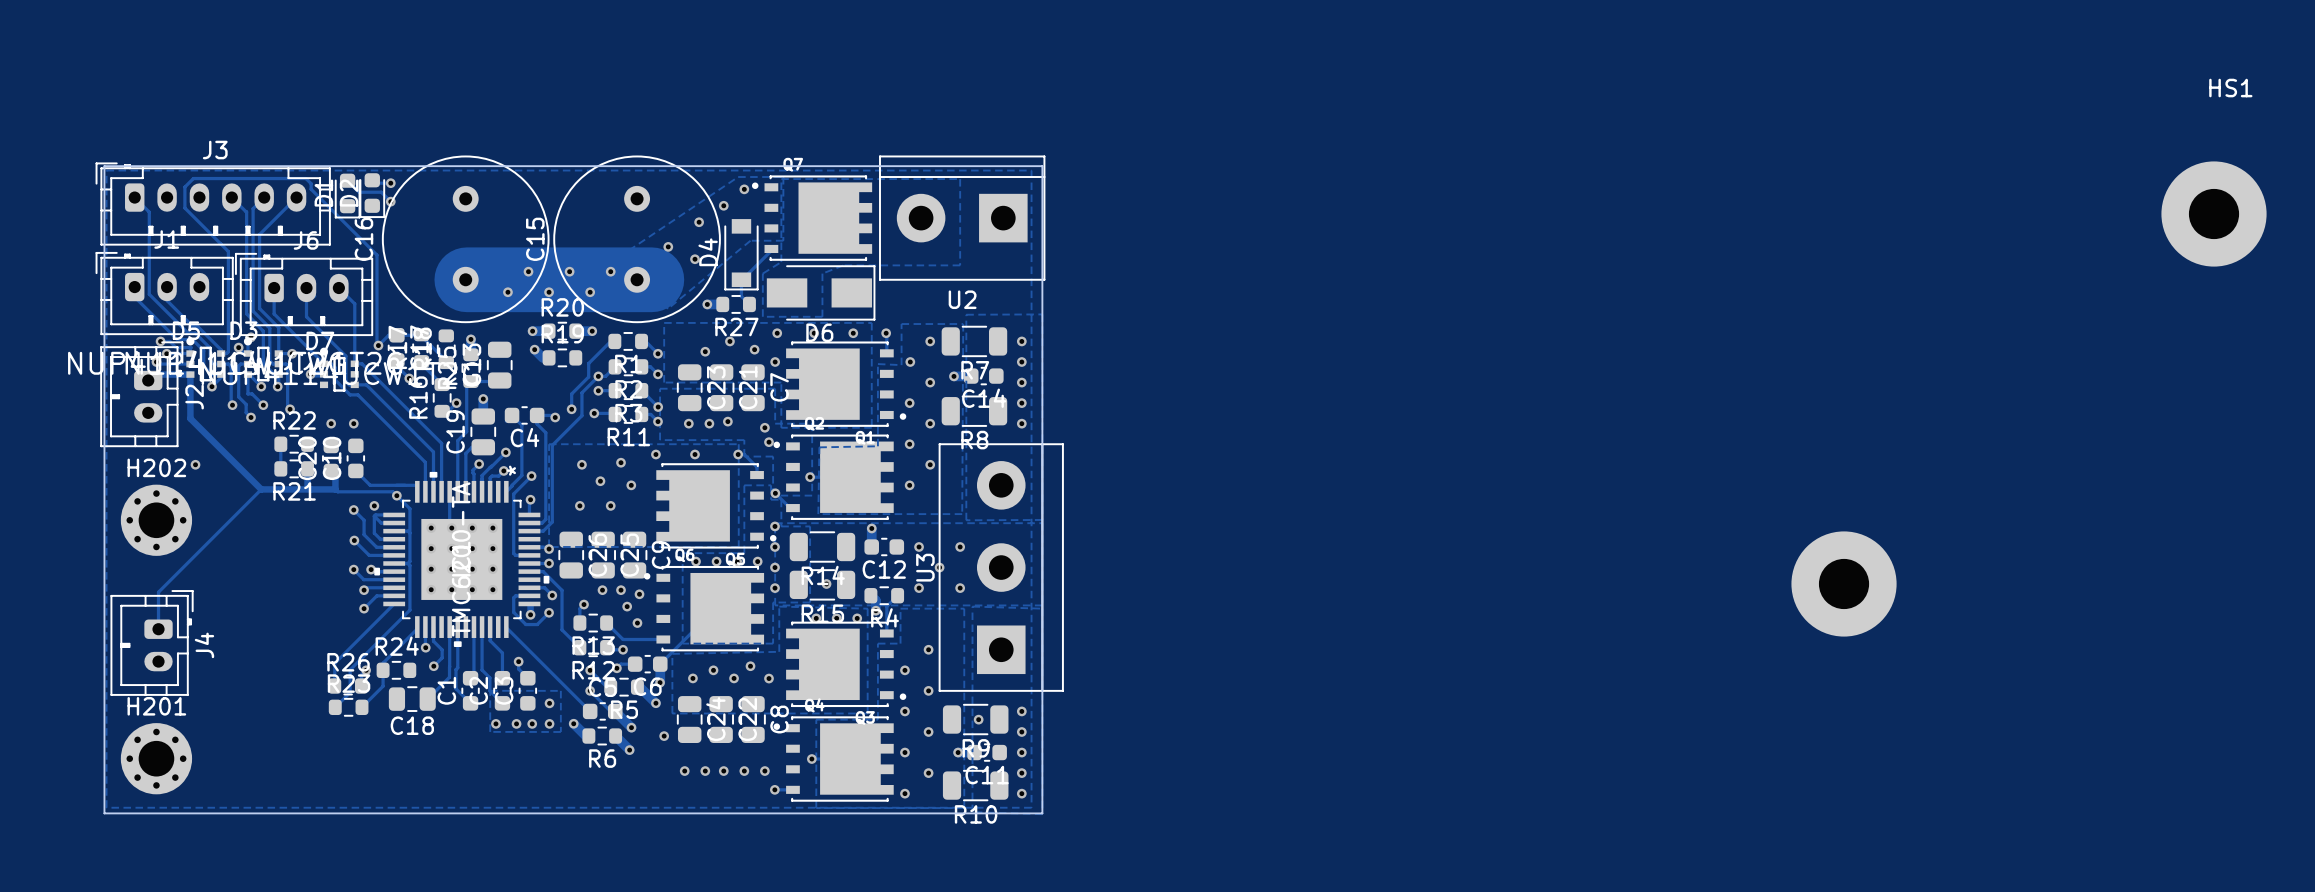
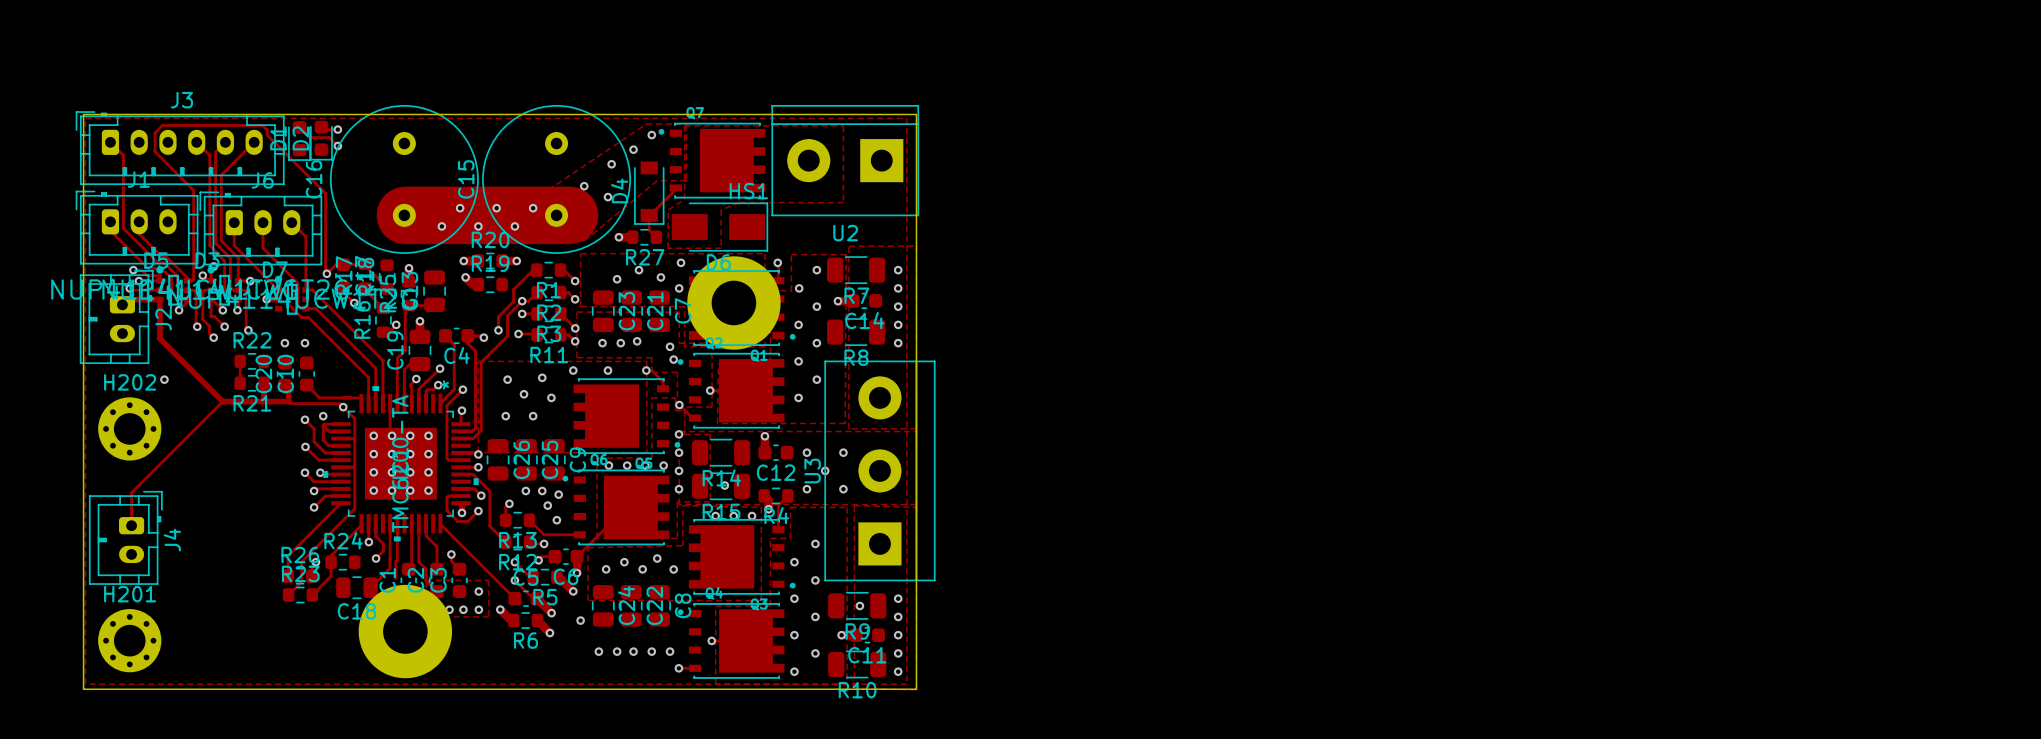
via: (814, 333) -> none
via: (853, 333) -> none
HS1 position: (2029, 399) -> (569, 467)
track: (455, 688) (470, 703) -> none
via: (495, 723) -> none

